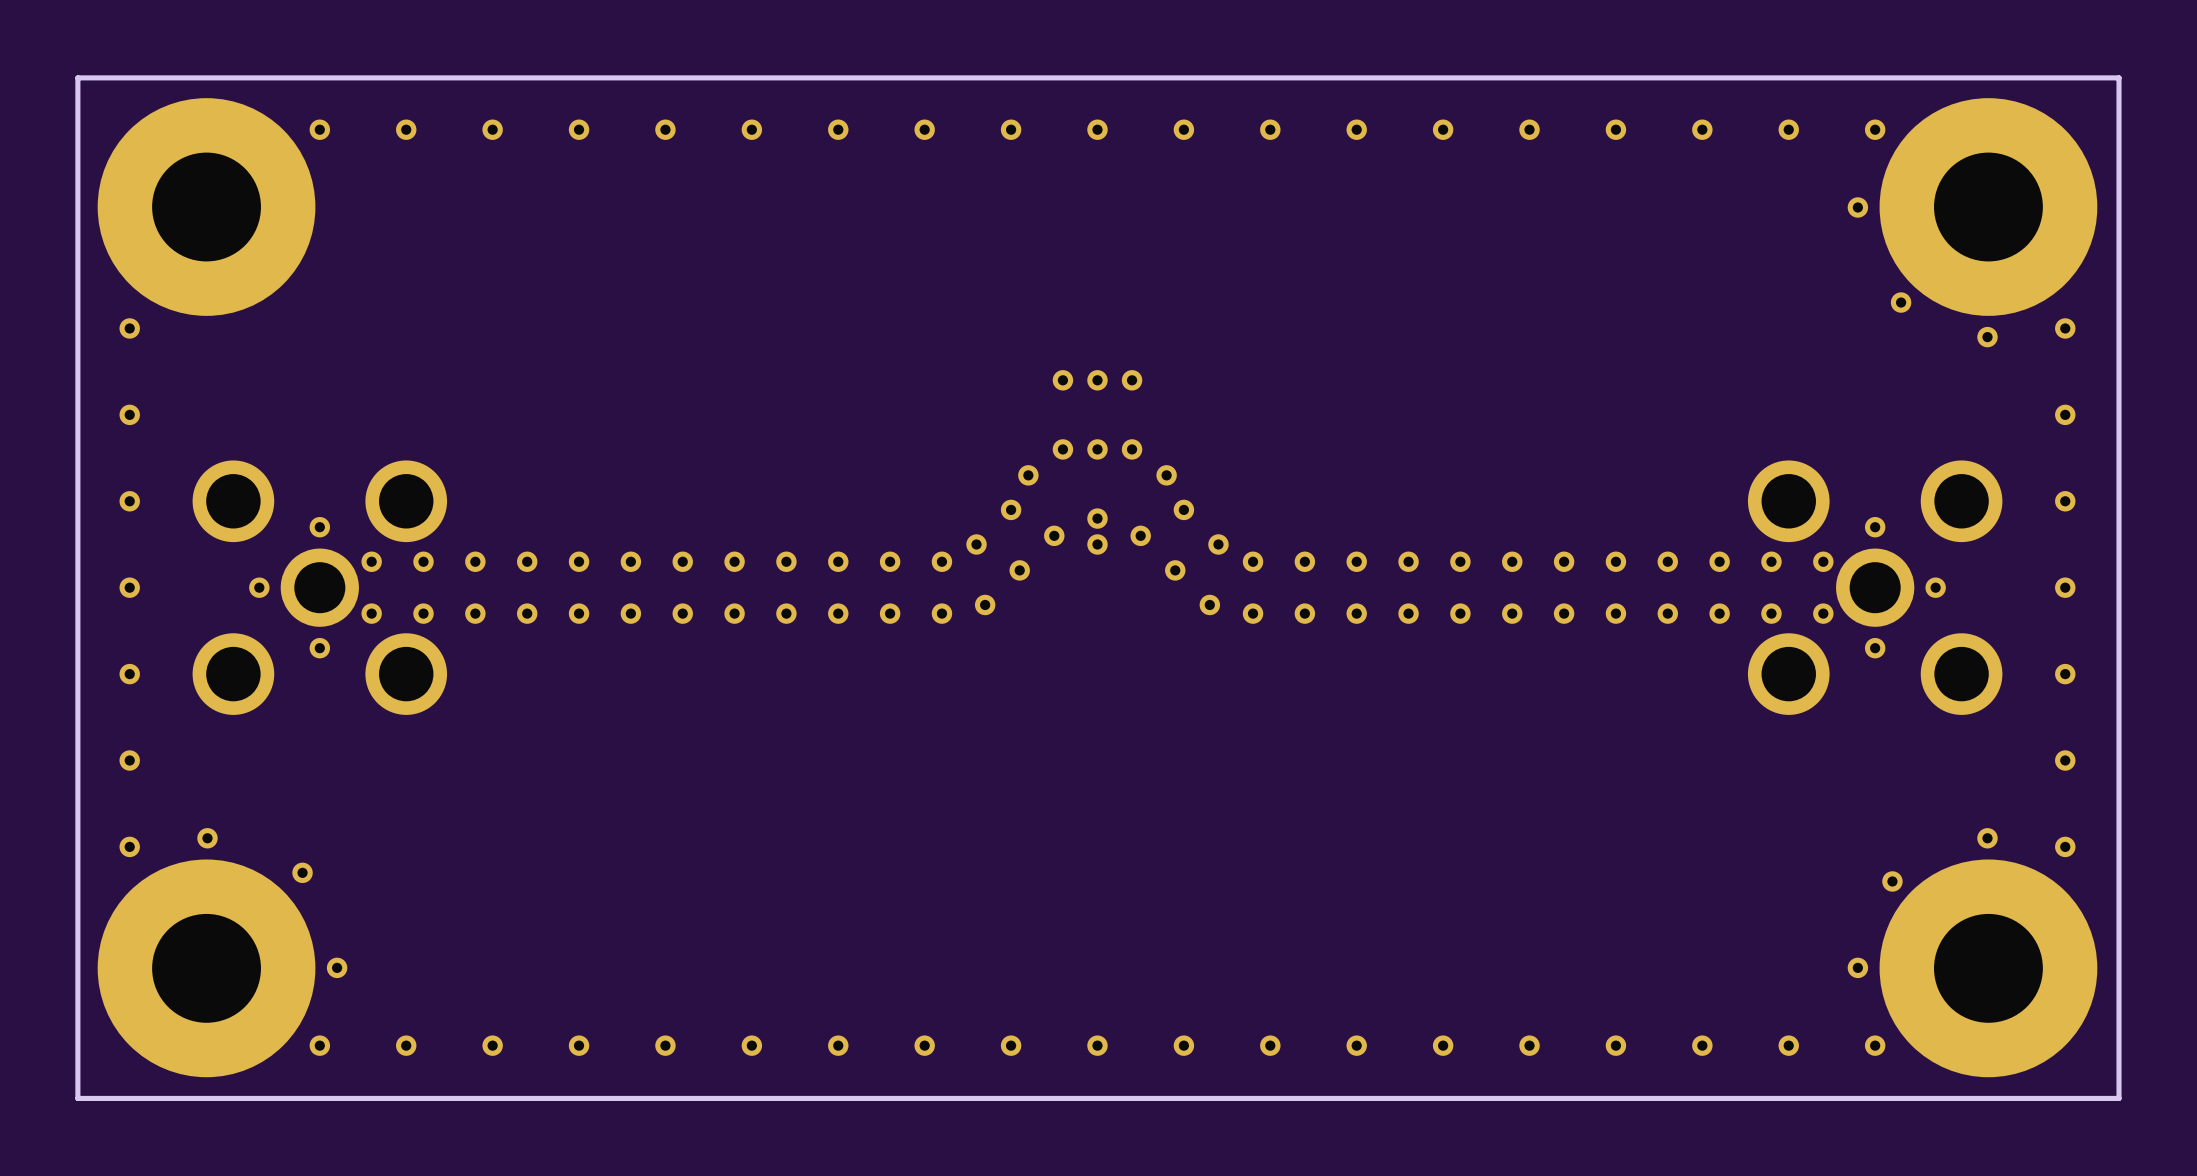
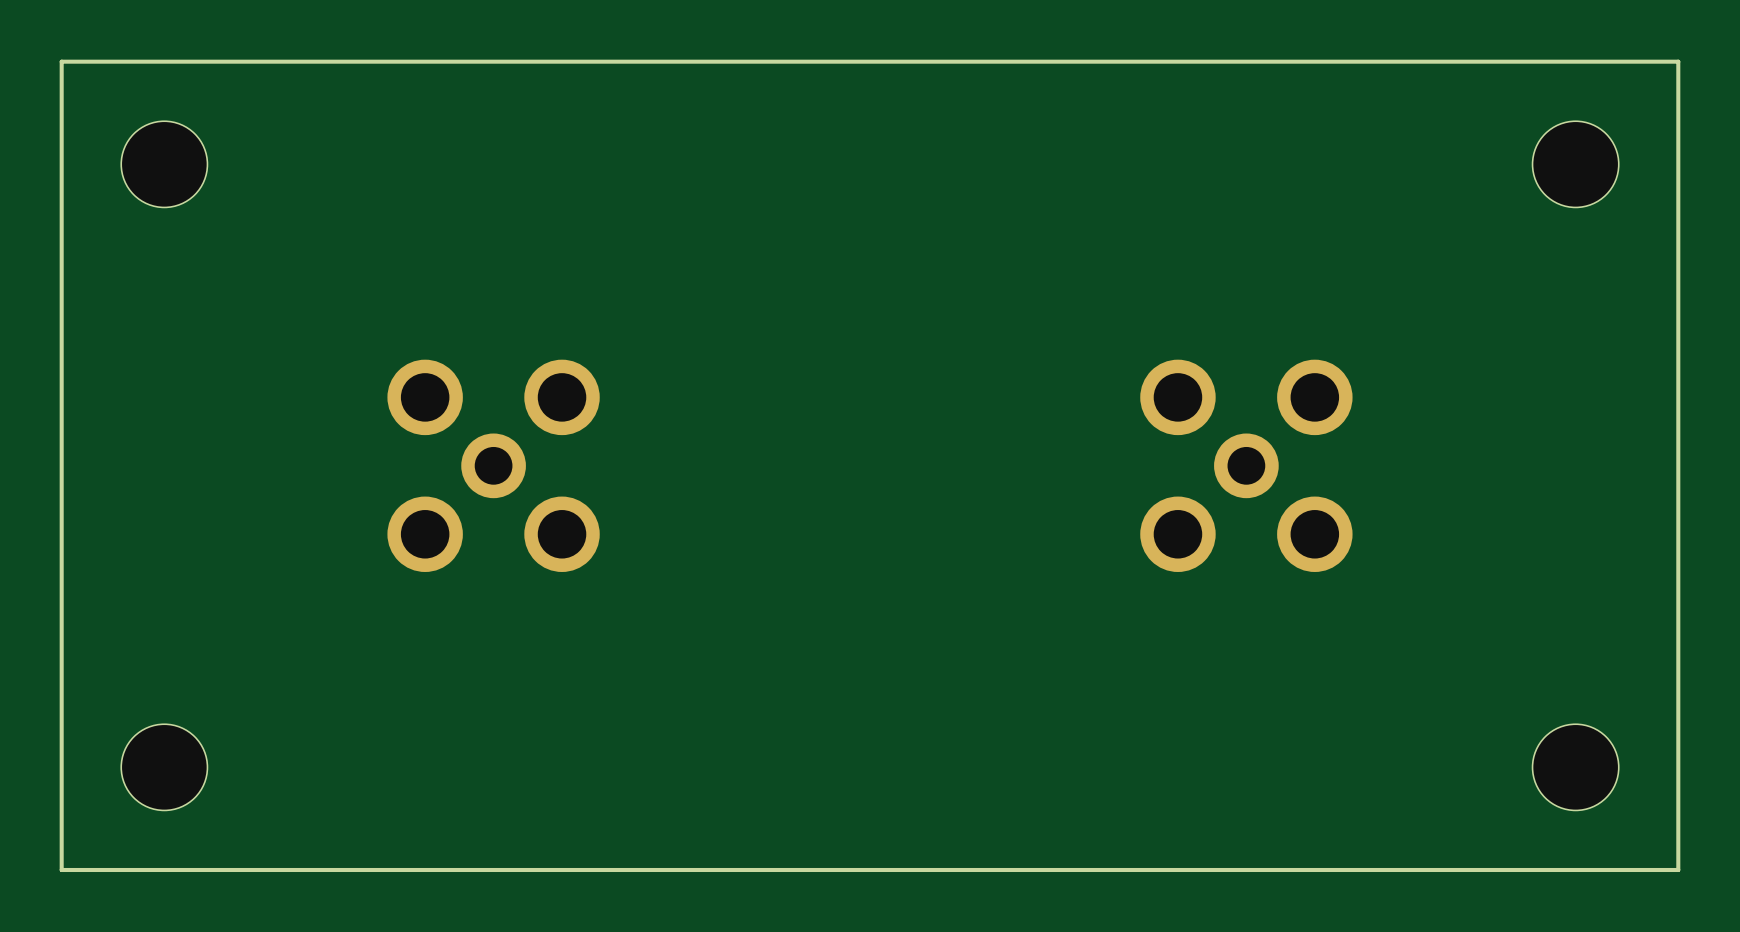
part footprint: [97, 98, 316, 316] -> [121, 121, 208, 208]
part footprint: [1879, 98, 2098, 316] -> [1532, 121, 1619, 208]
part: (319, 129) -> none
part: (406, 129) -> none
part: (492, 129) -> none
part: (579, 129) -> none
part: (665, 129) -> none
part: (751, 129) -> none
part: (838, 129) -> none
part: (924, 129) -> none
part: (1011, 129) -> none
part: (1097, 129) -> none
part: (1183, 129) -> none
part: (1270, 129) -> none
part: (1356, 129) -> none
part: (1443, 129) -> none
part: (1529, 129) -> none
part: (1615, 129) -> none
part: (1702, 129) -> none
part: (1788, 129) -> none
part: (1875, 129) -> none
part: (1857, 207) -> none
part: (1901, 302) -> none
part: (129, 328) -> none
part: (2065, 328) -> none
part: (1987, 337) -> none
part: (1062, 380) -> none
part: (1097, 380) -> none
part: (1132, 380) -> none
part: (129, 414) -> none
part: (2065, 414) -> none
part: (1062, 449) -> none
part: (1097, 449) -> none
part: (1132, 449) -> none
part: (1028, 475) -> none
part: (1166, 475) -> none
part: (129, 501) -> none
part: (2065, 501) -> none
part: (1011, 509) -> none
part: (1183, 509) -> none
part: (1097, 518) -> none
part: (319, 527) -> none
part: (1875, 527) -> none
part: (1054, 535) -> none
part: (1140, 535) -> none
part: (976, 544) -> none
part: (1097, 544) -> none
part: (1218, 544) -> none
part: (371, 561) -> none
part: (423, 561) -> none
part: (475, 561) -> none
part: (527, 561) -> none
part: (579, 561) -> none
part: (630, 561) -> none
part: (682, 561) -> none
part: (734, 561) -> none
part: (786, 561) -> none
part: (838, 561) -> none
part: (890, 561) -> none
part: (941, 561) -> none
part: (1253, 561) -> none
part: (1304, 561) -> none
part: (1356, 561) -> none
part: (1408, 561) -> none
part: (1460, 561) -> none
part: (1512, 561) -> none
part: (1564, 561) -> none
part: (1615, 561) -> none
part: (1667, 561) -> none
part: (1719, 561) -> none
part: (1771, 561) -> none
part: (1823, 561) -> none
part: (1019, 570) -> none
part: (1175, 570) -> none
part: (129, 587) -> none
part: (259, 587) -> none
part: (319, 587) -> none
part: (1875, 587) -> none
part: (1935, 587) -> none
part: (2065, 587) -> none
part: none -> (493, 465)
part: none -> (1246, 465)
part: (985, 604) -> none
part: (1209, 604) -> none
part: (371, 613) -> none
part: (423, 613) -> none
part: (475, 613) -> none
part: (527, 613) -> none
part: (579, 613) -> none
part: (630, 613) -> none
part: (682, 613) -> none
part: (734, 613) -> none
part: (786, 613) -> none
part: (838, 613) -> none
part: (890, 613) -> none
part: (941, 613) -> none
part: (1253, 613) -> none
part: (1304, 613) -> none
part: (1356, 613) -> none
part: (1408, 613) -> none
part: (1460, 613) -> none
part: (1512, 613) -> none
part: (1564, 613) -> none
part: (1615, 613) -> none
part: (1667, 613) -> none
part: (1719, 613) -> none
part: (1771, 613) -> none
part: (1823, 613) -> none
part: (319, 648) -> none
part: (1875, 648) -> none
part: (129, 674) -> none
part: (2065, 674) -> none
part: (129, 760) -> none
part: (2065, 760) -> none
part: (207, 838) -> none
part: (1987, 838) -> none
part: (129, 846) -> none
part: (2065, 846) -> none
part footprint: [97, 859, 316, 1078] -> [121, 724, 208, 811]
part footprint: [1879, 859, 2098, 1078] -> [1532, 724, 1619, 811]
part: (302, 872) -> none
part: (1892, 881) -> none
part: (337, 967) -> none
part: (1857, 967) -> none
part: (319, 1045) -> none
part: (406, 1045) -> none
part: (492, 1045) -> none
part: (579, 1045) -> none
part: (665, 1045) -> none
part: (751, 1045) -> none
part: (838, 1045) -> none
part: (924, 1045) -> none
part: (1011, 1045) -> none
part: (1097, 1045) -> none
part: (1183, 1045) -> none
part: (1270, 1045) -> none
part: (1356, 1045) -> none
part: (1443, 1045) -> none
part: (1529, 1045) -> none
part: (1615, 1045) -> none
part: (1702, 1045) -> none
part: (1788, 1045) -> none
part: (1875, 1045) -> none

